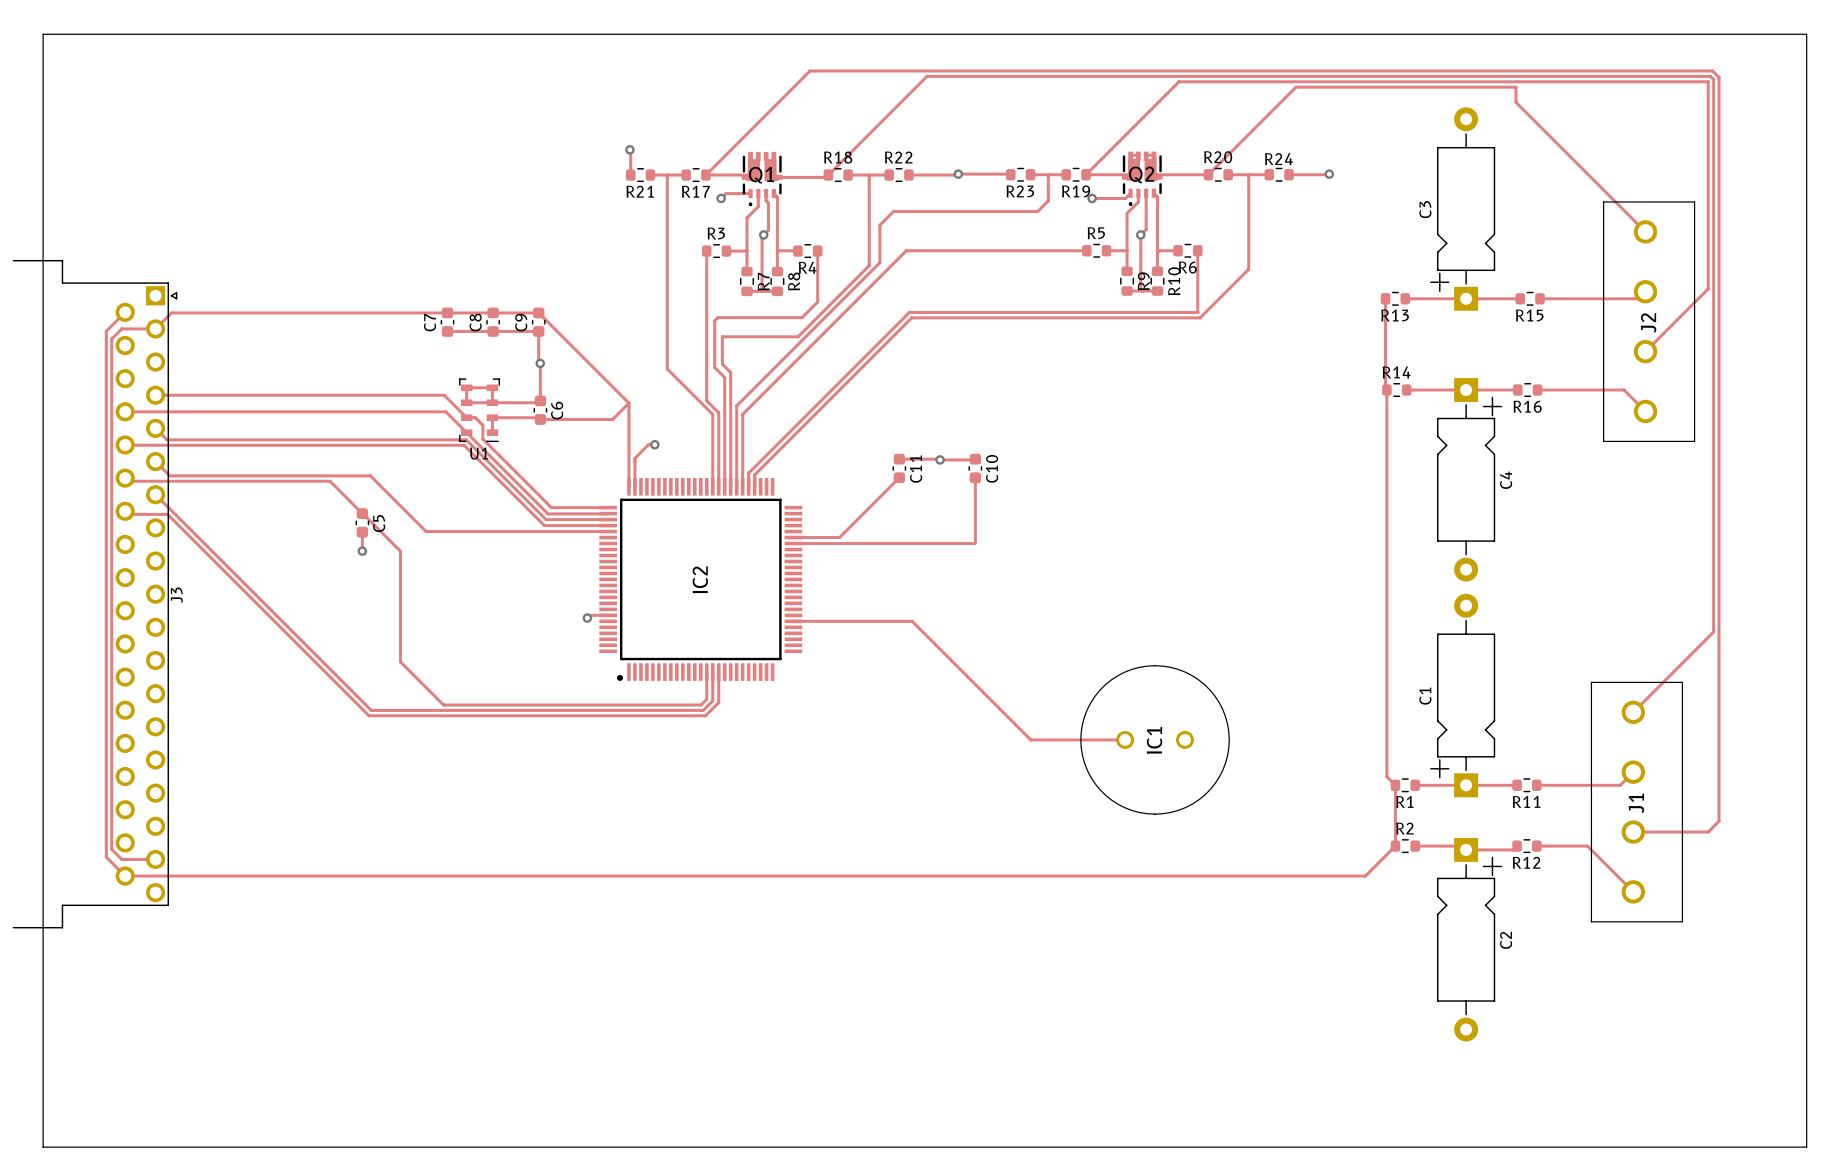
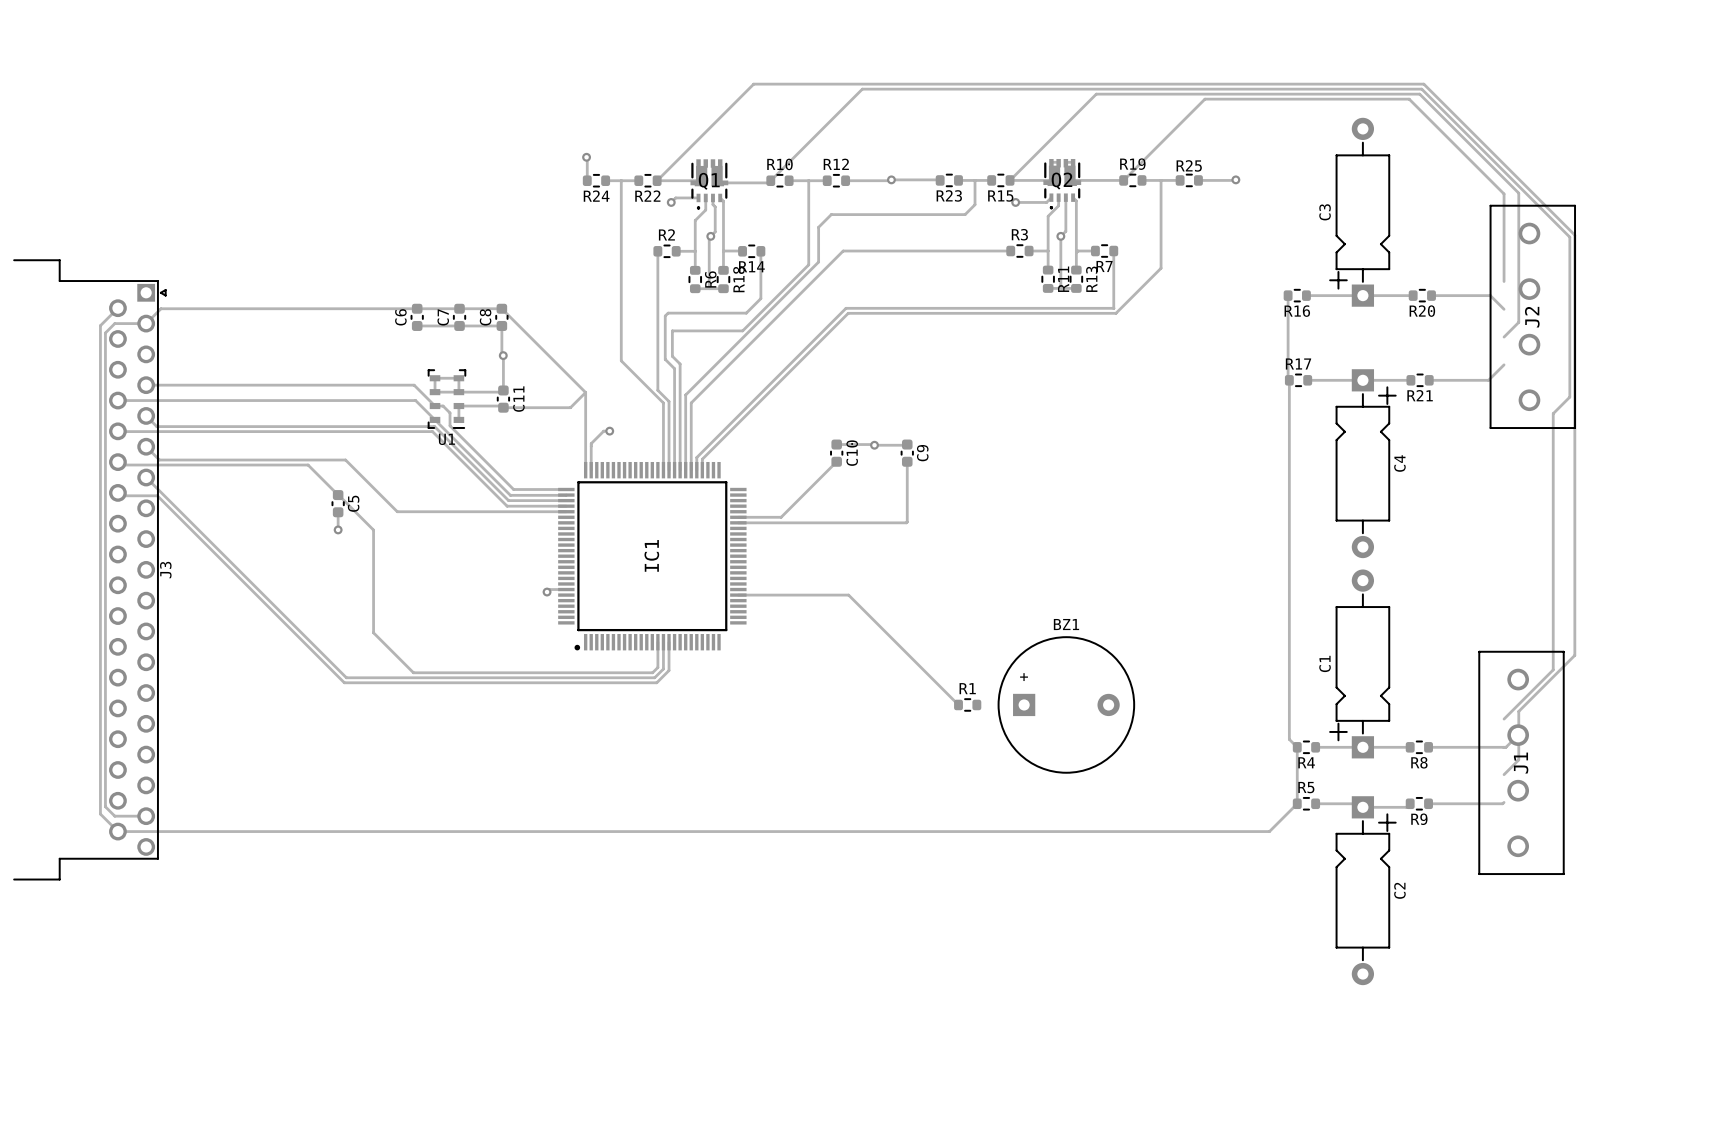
board edge: (43, 34) (1806, 34) (1806, 1147) (43, 1147) (43, 34) -> none
track: (1531, 71) (1712, 71) (1719, 77) (1719, 821) (1708, 832) (1633, 832) -> (1423, 84) (1574, 235) (1574, 655) (1518, 711) (1518, 759) (1504, 774)
track: (1529, 76) (1710, 76) (1713, 79) (1713, 632) (1633, 712) -> (1421, 89) (1569, 237) (1569, 397) (1553, 413) (1553, 669) (1504, 719)
track: (1527, 81) (1708, 81) (1708, 288) (1645, 351) -> (1419, 94) (1518, 193) (1518, 322) (1504, 337)
track: (1515, 87) (1515, 102) (1645, 231) -> (1409, 99) (1504, 193) (1504, 281)
R18 name: R18 (838, 157) -> R10 (779, 164)
R22 name: R22 (898, 157) -> R12 (836, 164)
R20 name: R20 (1218, 157) -> R19 (1132, 164)
R24 name: R24 (1278, 159) -> R25 (1189, 165)
R21 name: R21 (640, 191) -> R24 (596, 196)
R17 name: R17 (695, 191) -> R22 (647, 196)
R19 name: R19 (1076, 191) -> R15 (1000, 196)
R3 name: R3 (716, 233) -> R2 (666, 234)
R5 name: R5 (1096, 233) -> R3 (1019, 234)
R4 name: R4 (807, 267) -> R14 (751, 266)
R6 name: R6 (1187, 267) -> R7 (1104, 266)
R7 name: R7 (763, 281) -> R6 (710, 279)
R8 name: R8 (794, 281) -> R18 (738, 279)
R9 name: R9 (1143, 281) -> R11 (1063, 279)
R10 name: R10 (1174, 281) -> R13 (1091, 279)
track: (1645, 291) (1638, 298) (1603, 298) -> (1504, 309) (1490, 295)
R13 name: R13 (1395, 315) -> R16 (1297, 311)
R15 name: R15 (1529, 315) -> R20 (1422, 311)
C7 name: C7 (430, 322) -> C6 (400, 317)
C8 name: C8 (475, 322) -> C7 (443, 317)
C9 name: C9 (521, 322) -> C8 (485, 317)
R14 name: R14 (1396, 372) -> R17 (1298, 364)
track: (1601, 390) (1624, 390) (1645, 411) -> (1488, 380) (1504, 364)
R16 name: R16 (1527, 406) -> R21 (1420, 395)
C6 name: C6 (557, 410) -> C11 (518, 399)
C10 name: C10 (992, 468) -> C9 (922, 453)
C11 name: C11 (916, 469) -> C10 (852, 453)
IC2 name: IC2 (700, 579) -> IC1 (651, 555)
track: (1030, 739) (1125, 739) -> none
R1: none -> (967, 704)
BZ1: none -> (1066, 704)
IC1: (1155, 739) -> none
R1 name: R1 (1404, 801) -> R4 (1306, 762)
R11 name: R11 (1526, 801) -> R8 (1419, 762)
R2 name: R2 (1404, 828) -> R5 (1306, 787)
track: (1587, 846) (1633, 891) -> (1475, 803) (1504, 802)
R12 name: R12 (1526, 862) -> R9 (1419, 819)

